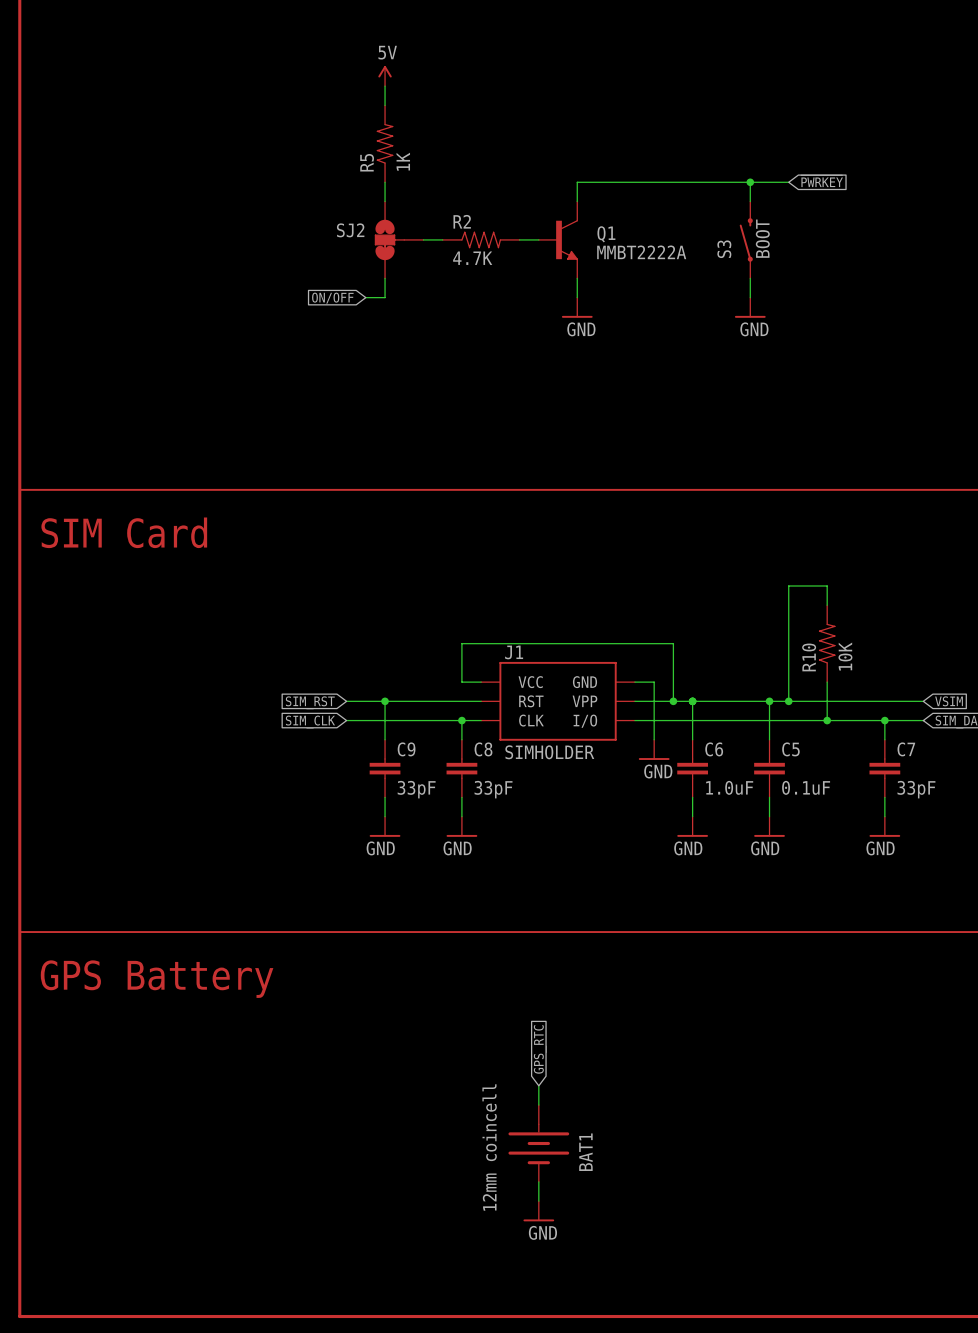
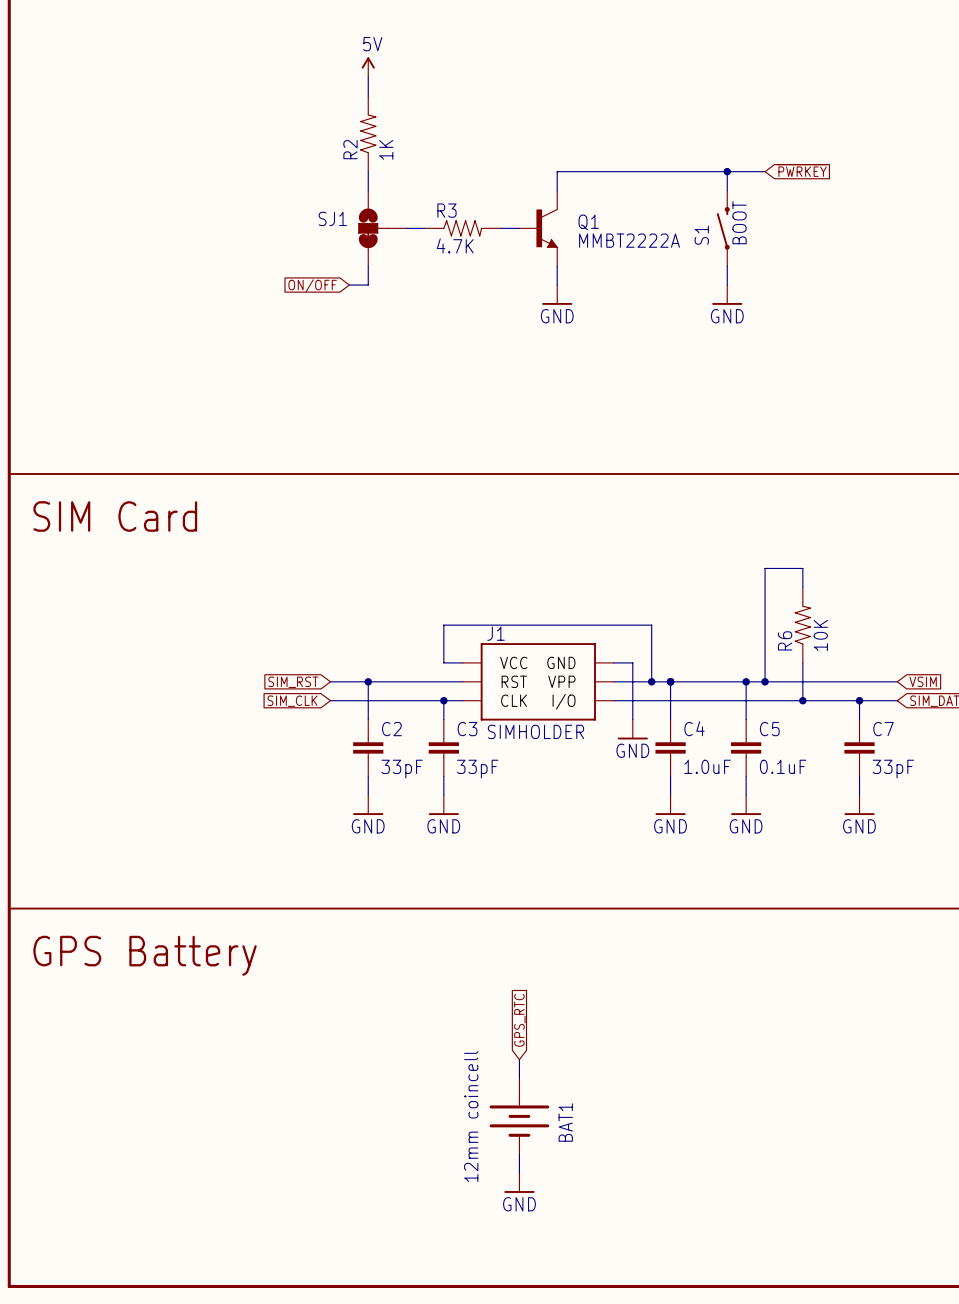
R5 name: R5 (367, 162) -> R2 (350, 149)
R2 name: R2 (462, 221) -> R3 (446, 210)
SJ2 name: SJ2 (350, 230) -> SJ1 (332, 218)
S3 name: S3 (724, 249) -> S1 (701, 235)
R10 name: R10 (809, 657) -> R6 (785, 640)
C9 name: C9 (406, 749) -> C2 (391, 729)
C8 name: C8 (483, 749) -> C3 (467, 729)
C6 name: C6 (714, 749) -> C4 (694, 728)

